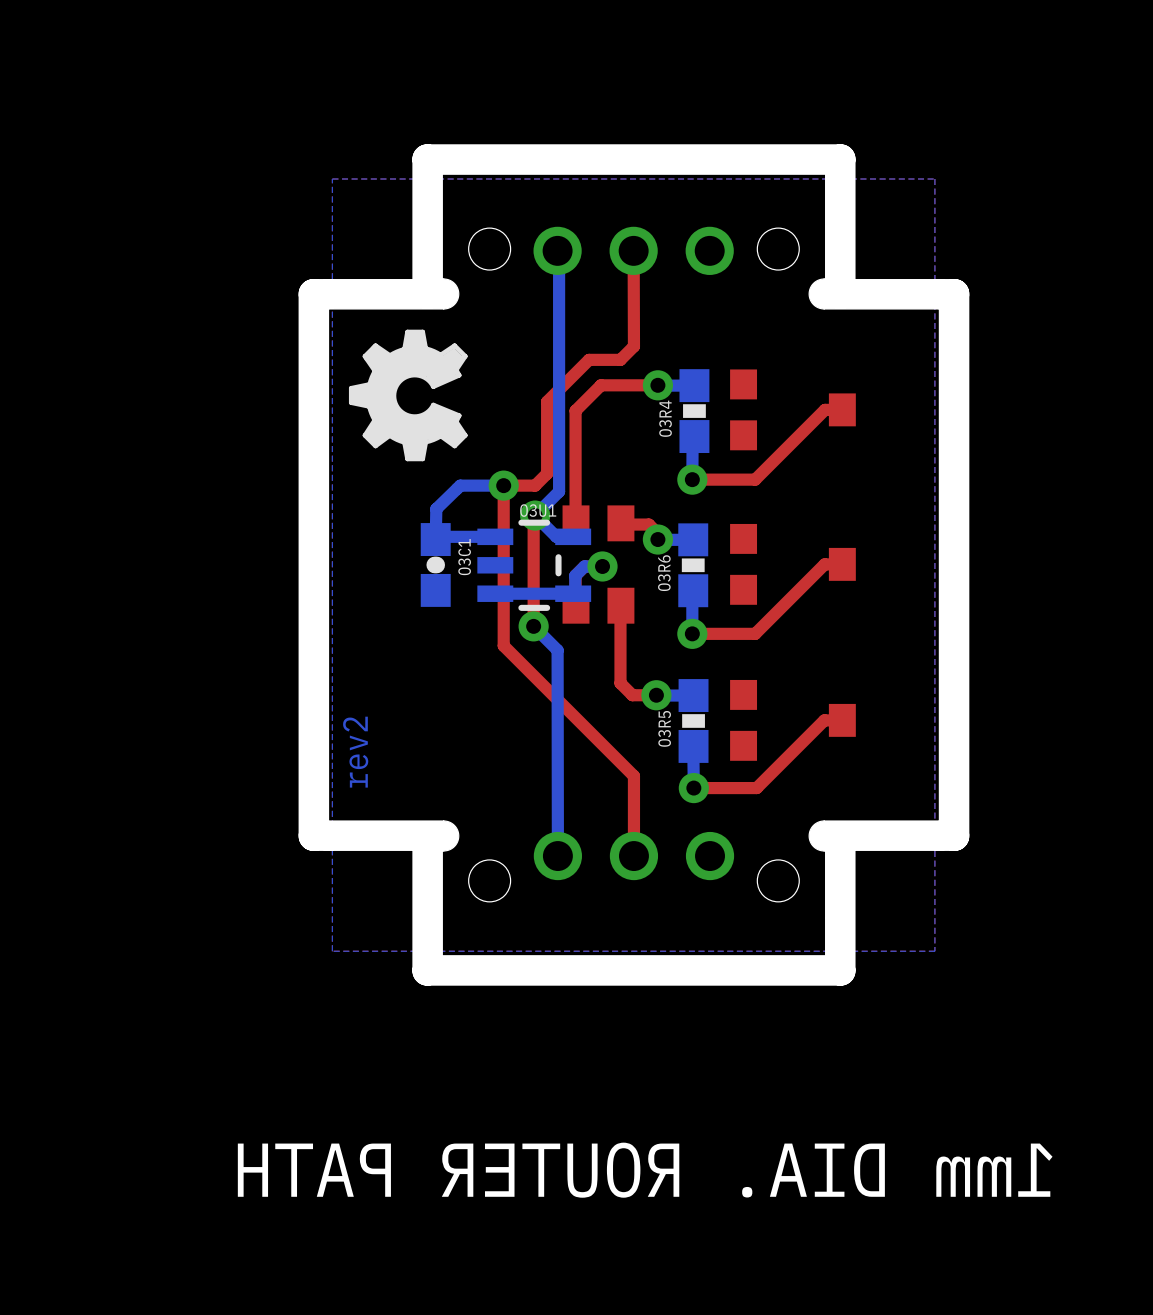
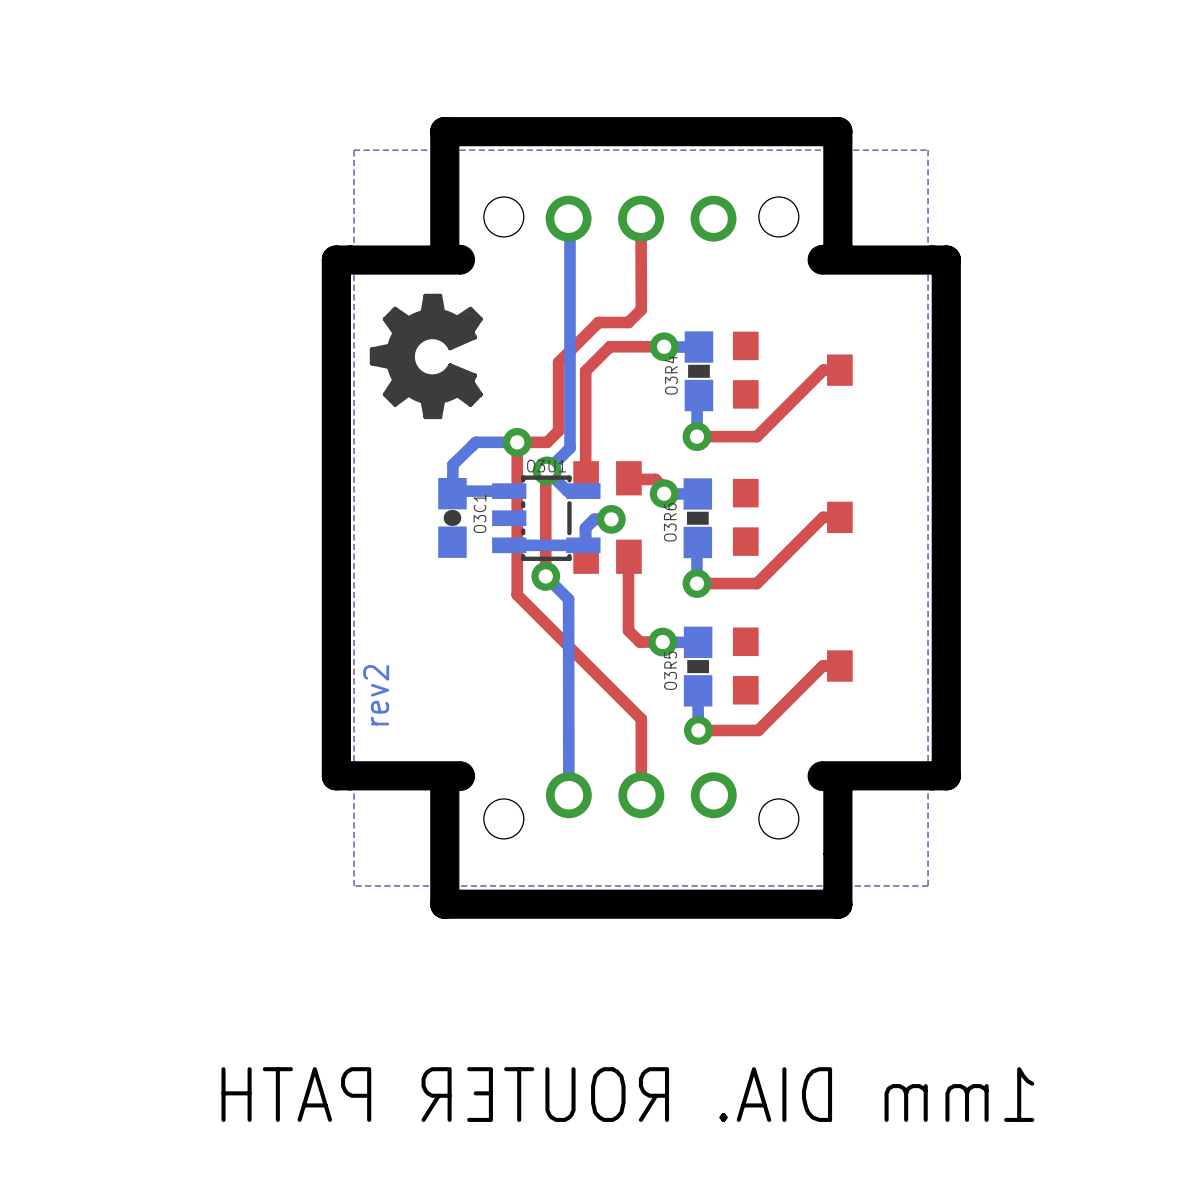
O3U1 footprint: [477, 519, 592, 611] -> [492, 475, 601, 561]

